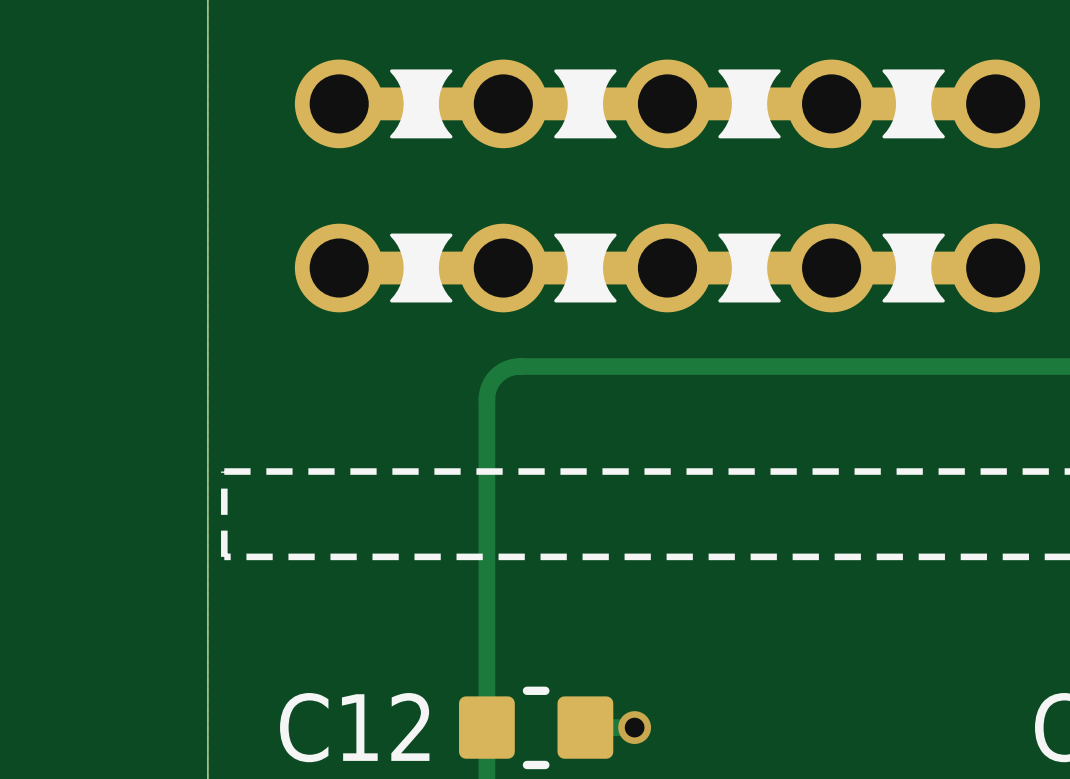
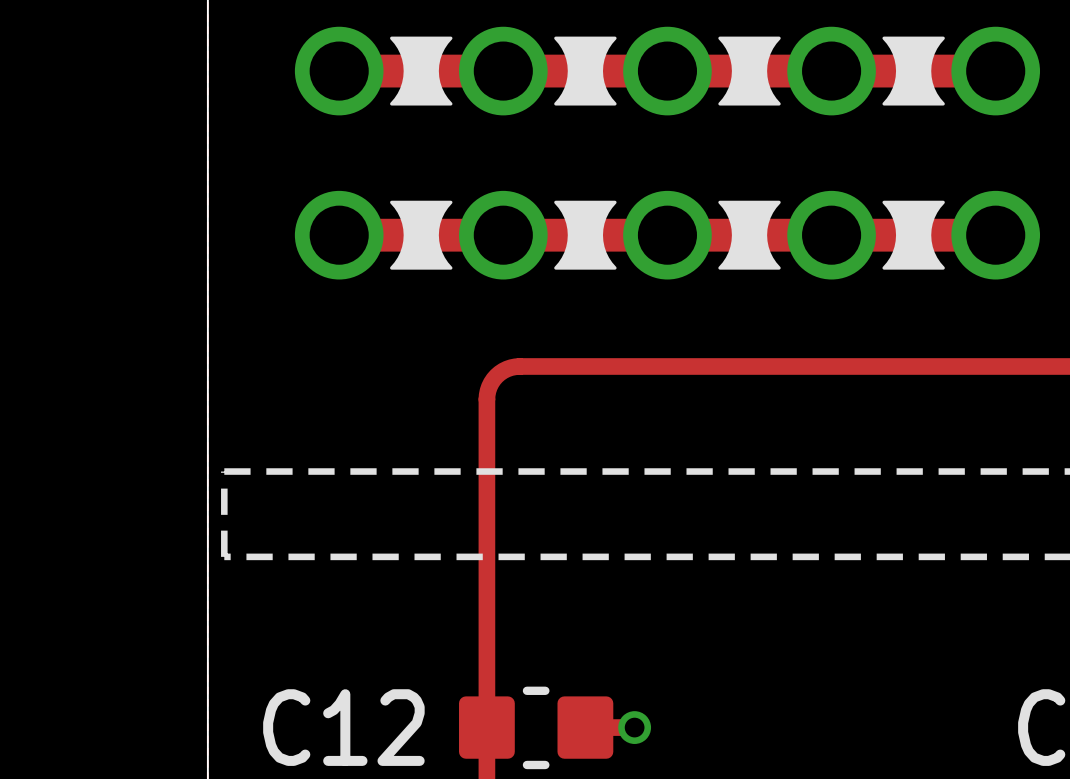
part position: (667, 103) -> (667, 71)
part position: (667, 268) -> (667, 235)

